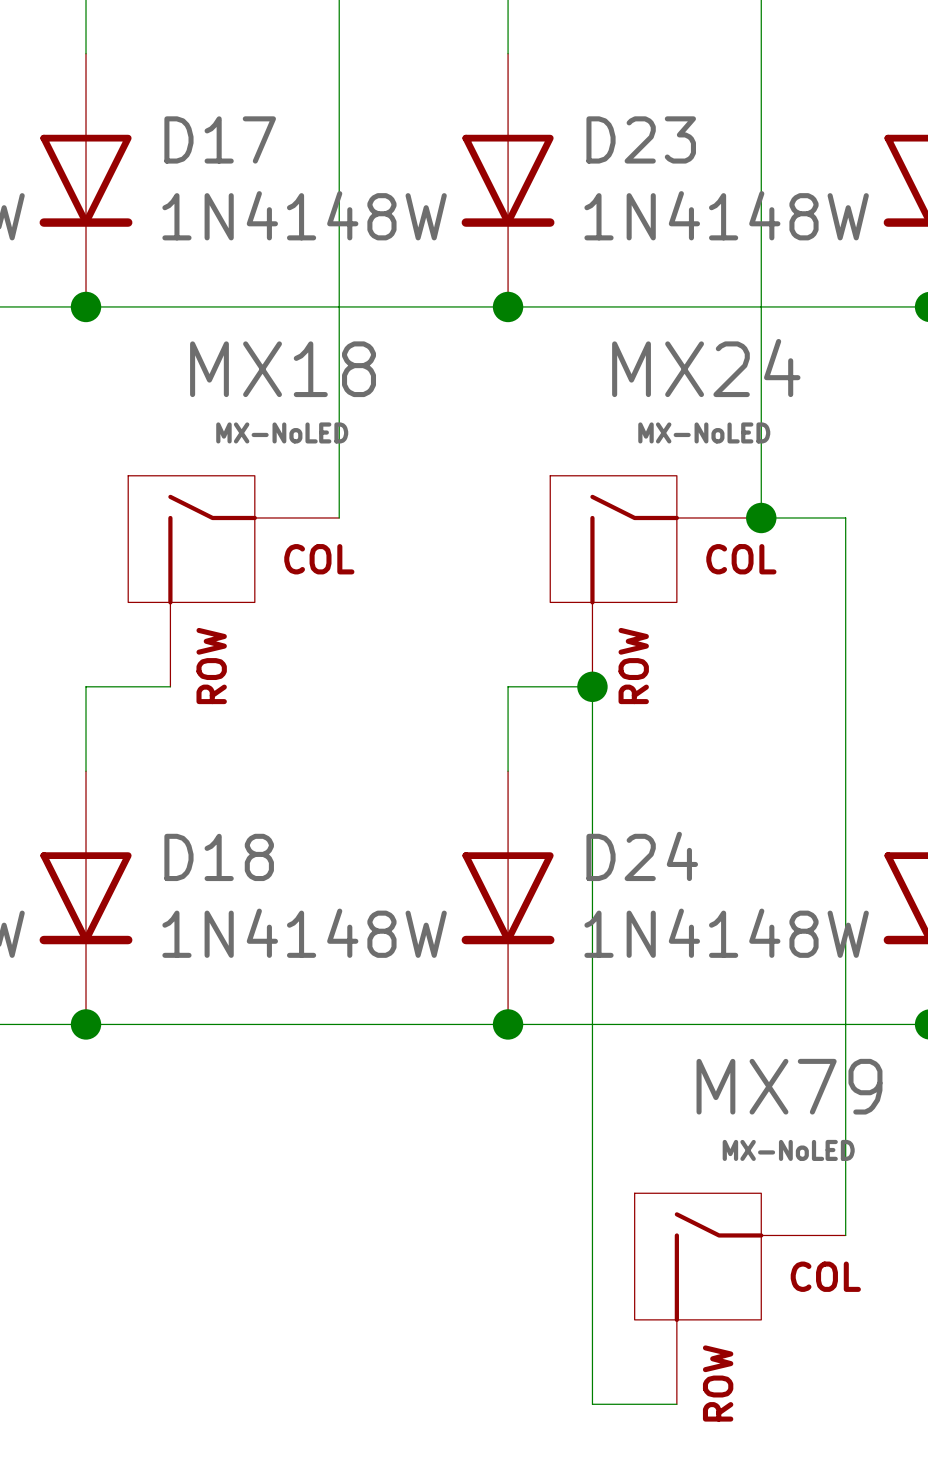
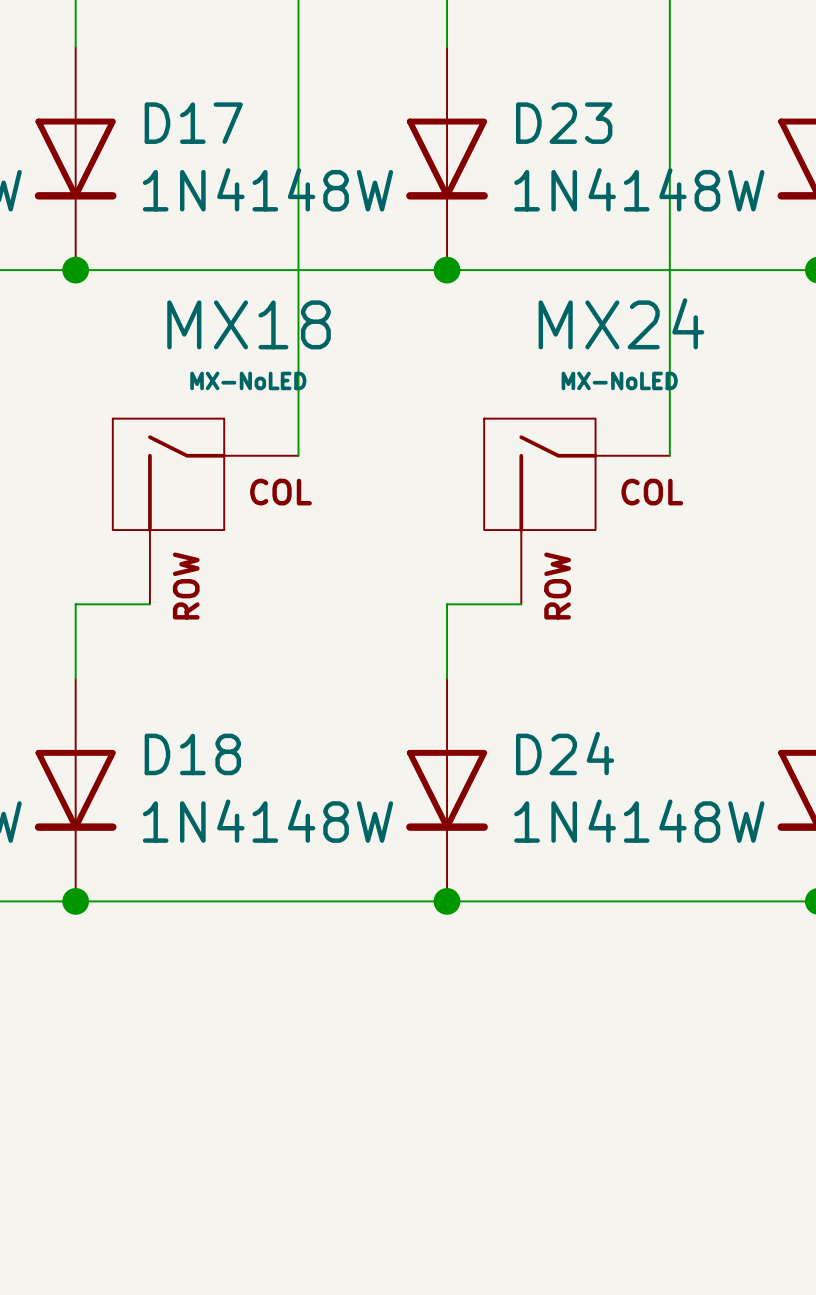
wire: (761, 517) (845, 517) (845, 1235) -> none
junction: (761, 517) -> none
wire: (592, 686) (592, 1404) (676, 1404) -> none
junction: (592, 686) -> none
MX79: MX-NoLED (740, 1298) -> none

